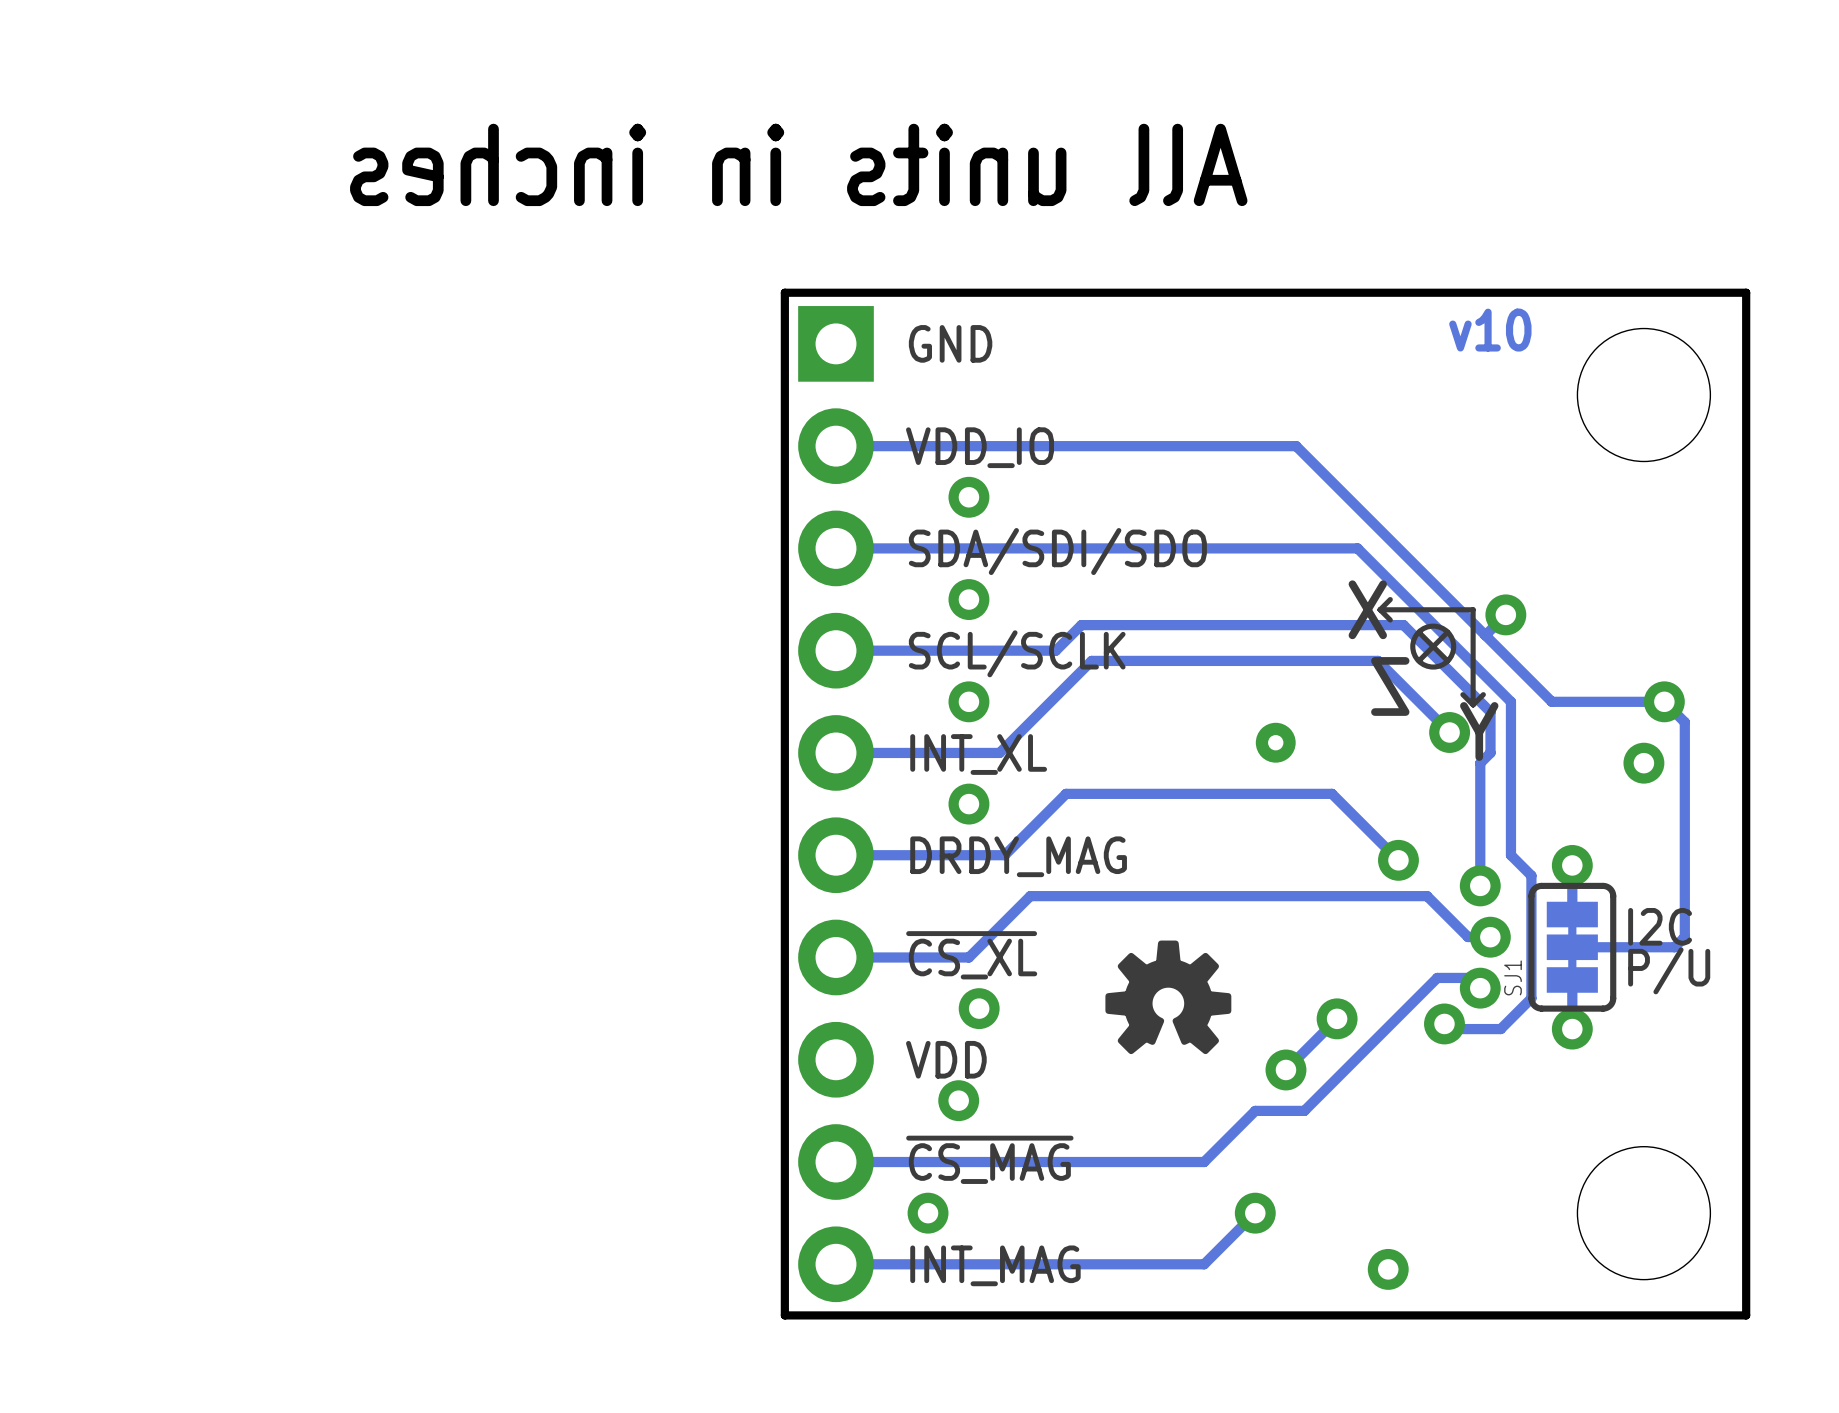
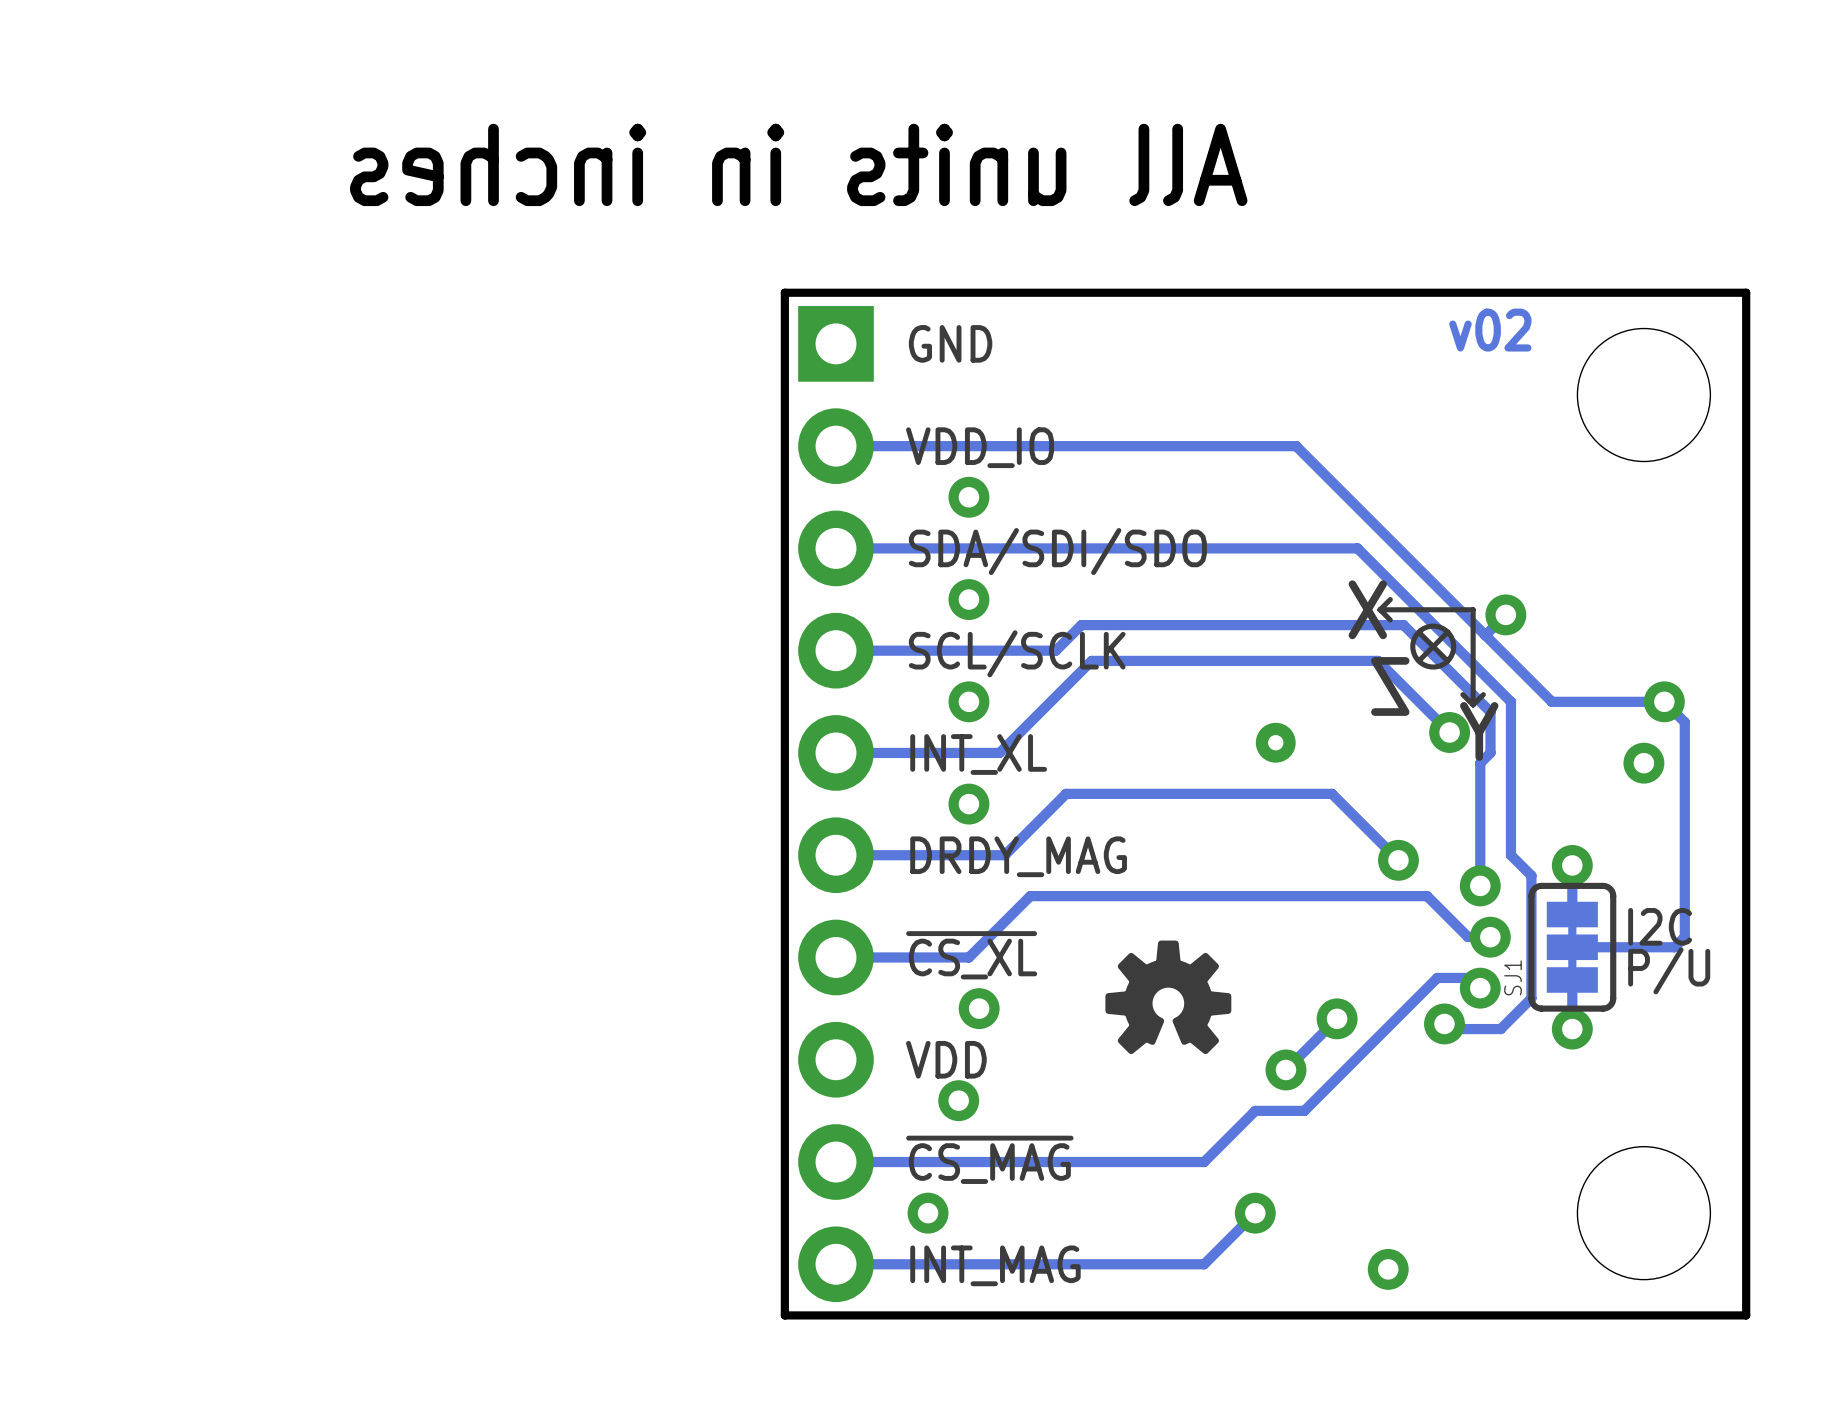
text: v10 (1490, 330) -> v02 (1490, 330)

